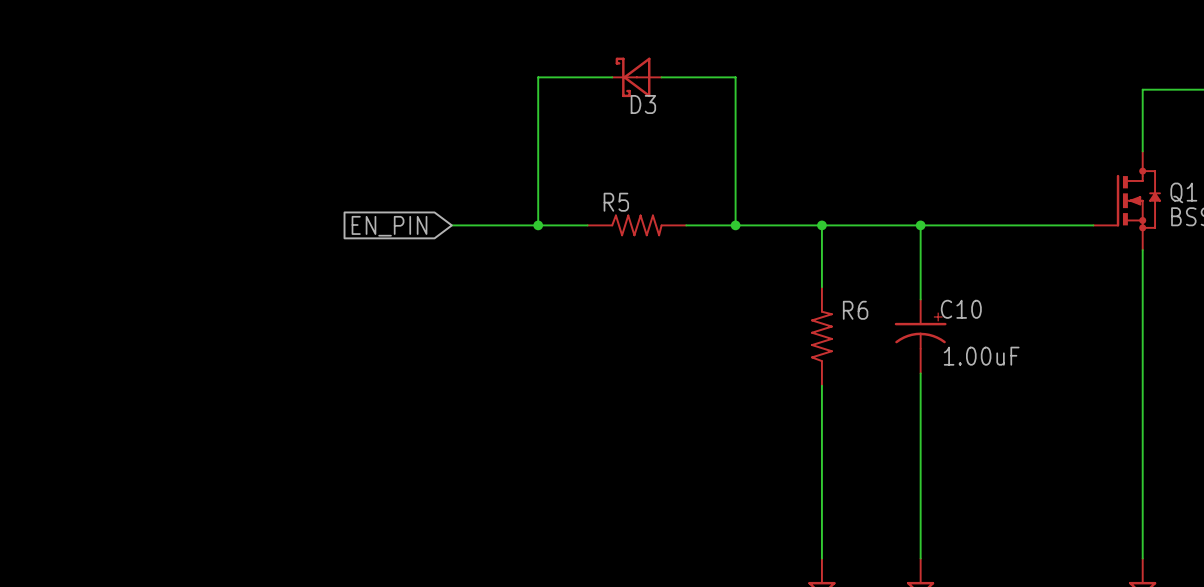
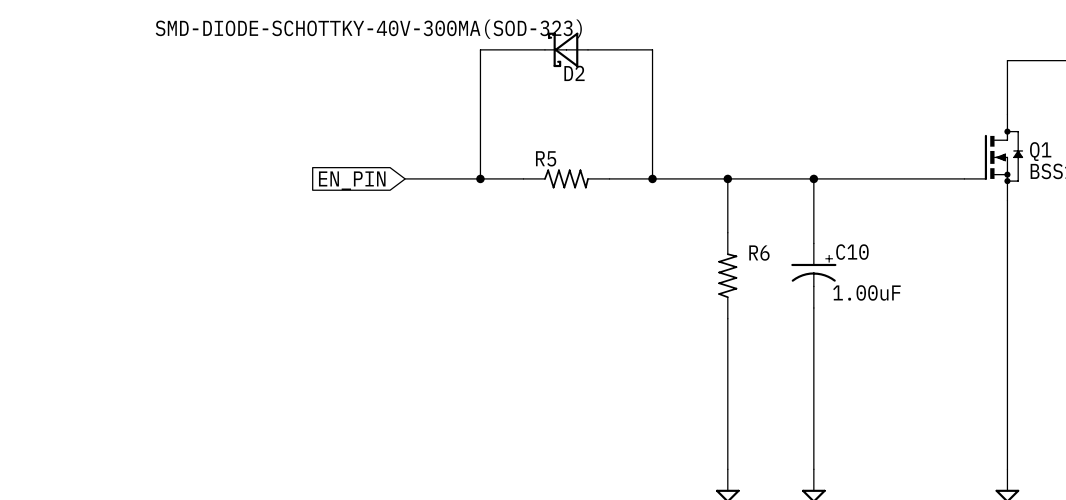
D3 value: none -> SMD-DIODE-SCHOTTKY-40V-300MA(SOD-323) (368, 29)
D3 name: D3 (643, 104) -> D2 (574, 73)

